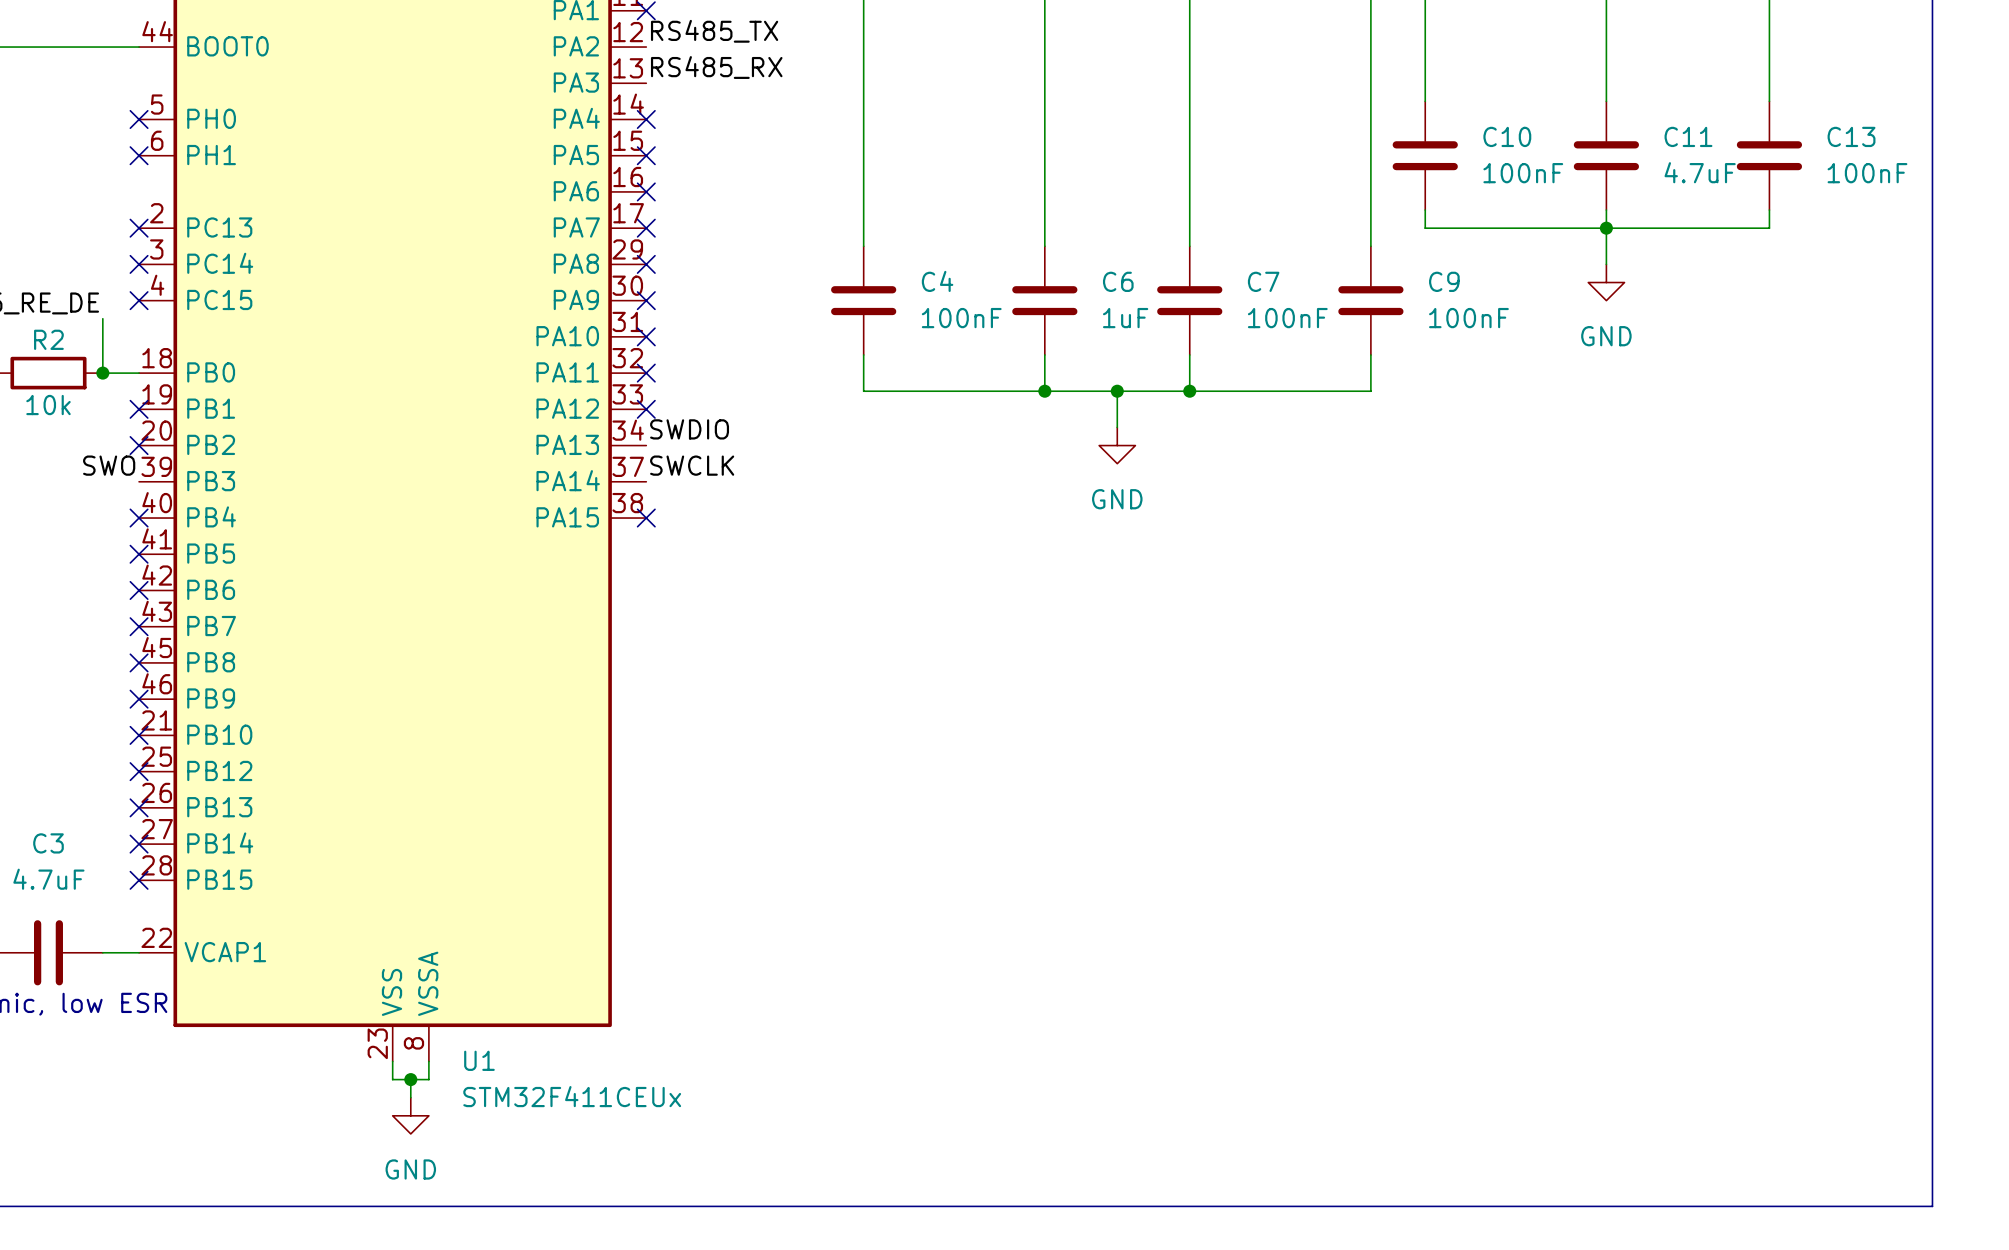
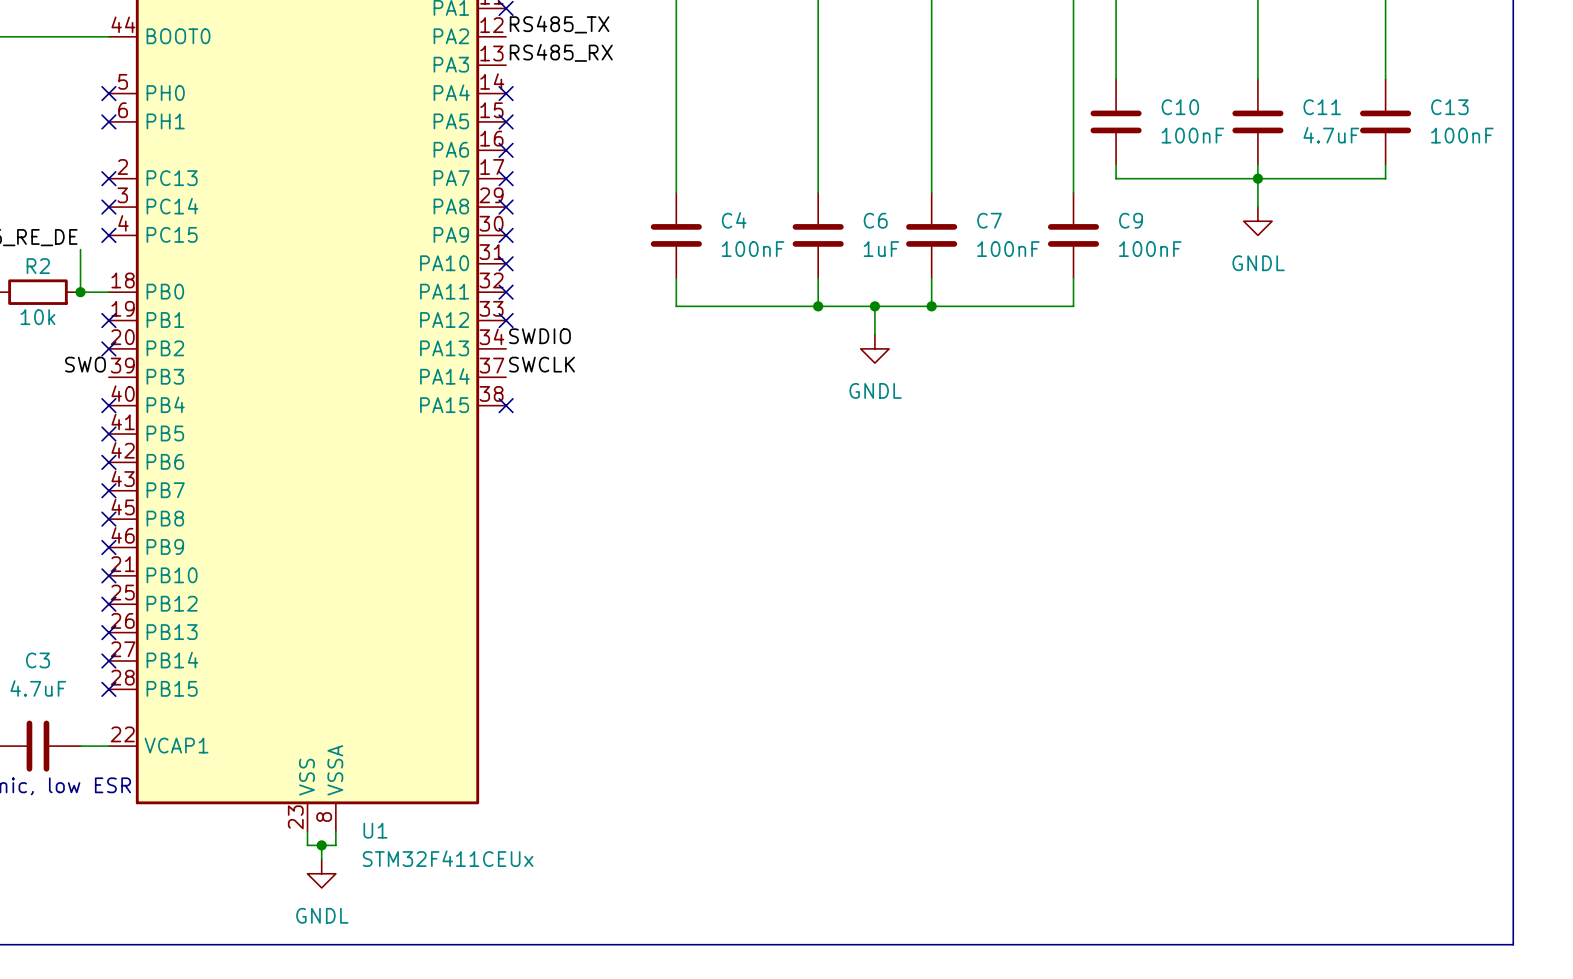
power symbol: GND (1606, 282) -> GNDL (1257, 221)
power symbol: GND (1117, 445) -> GNDL (874, 348)
power symbol: GND (410, 1115) -> GNDL (321, 873)

